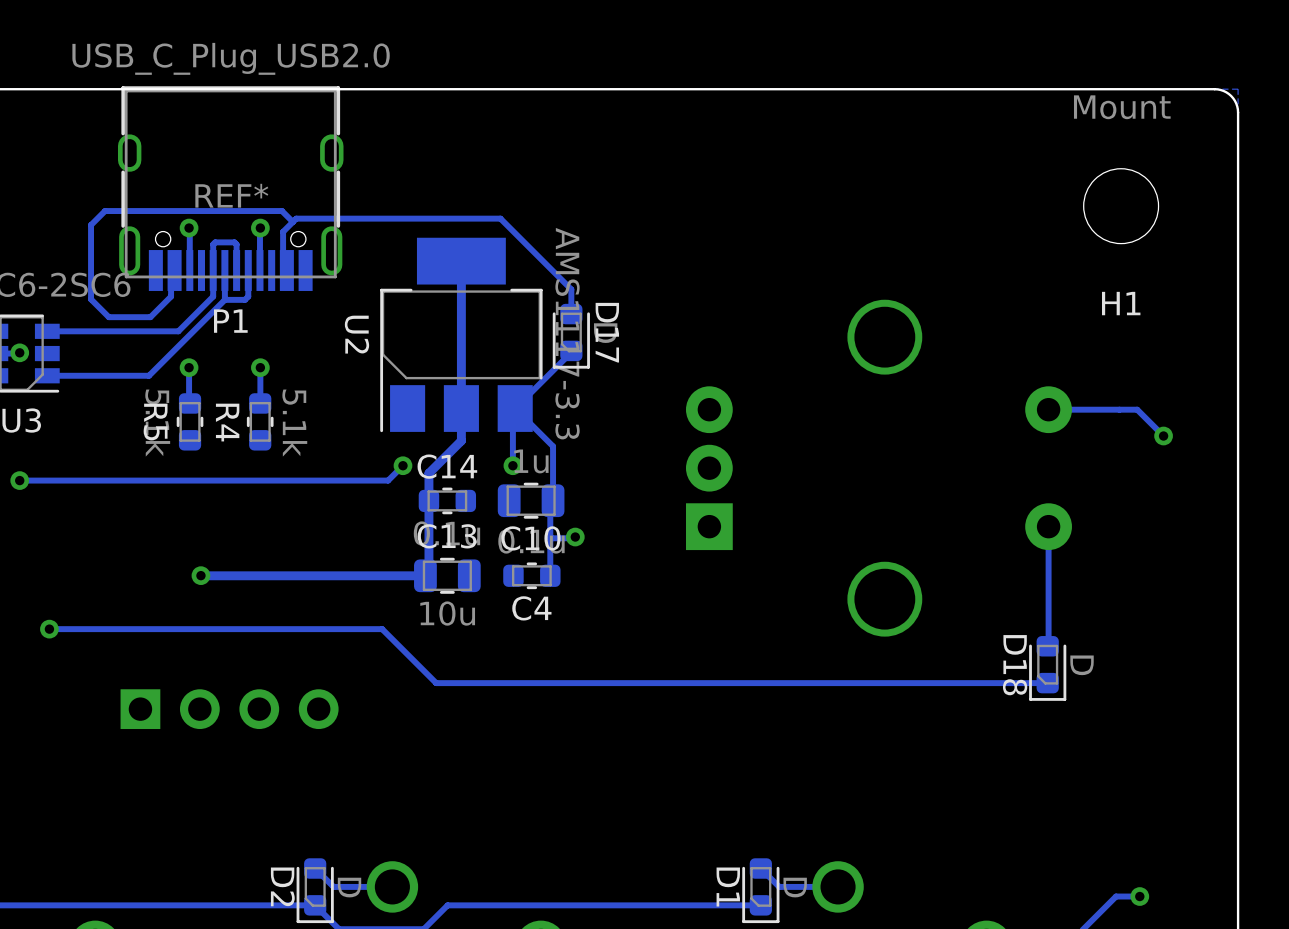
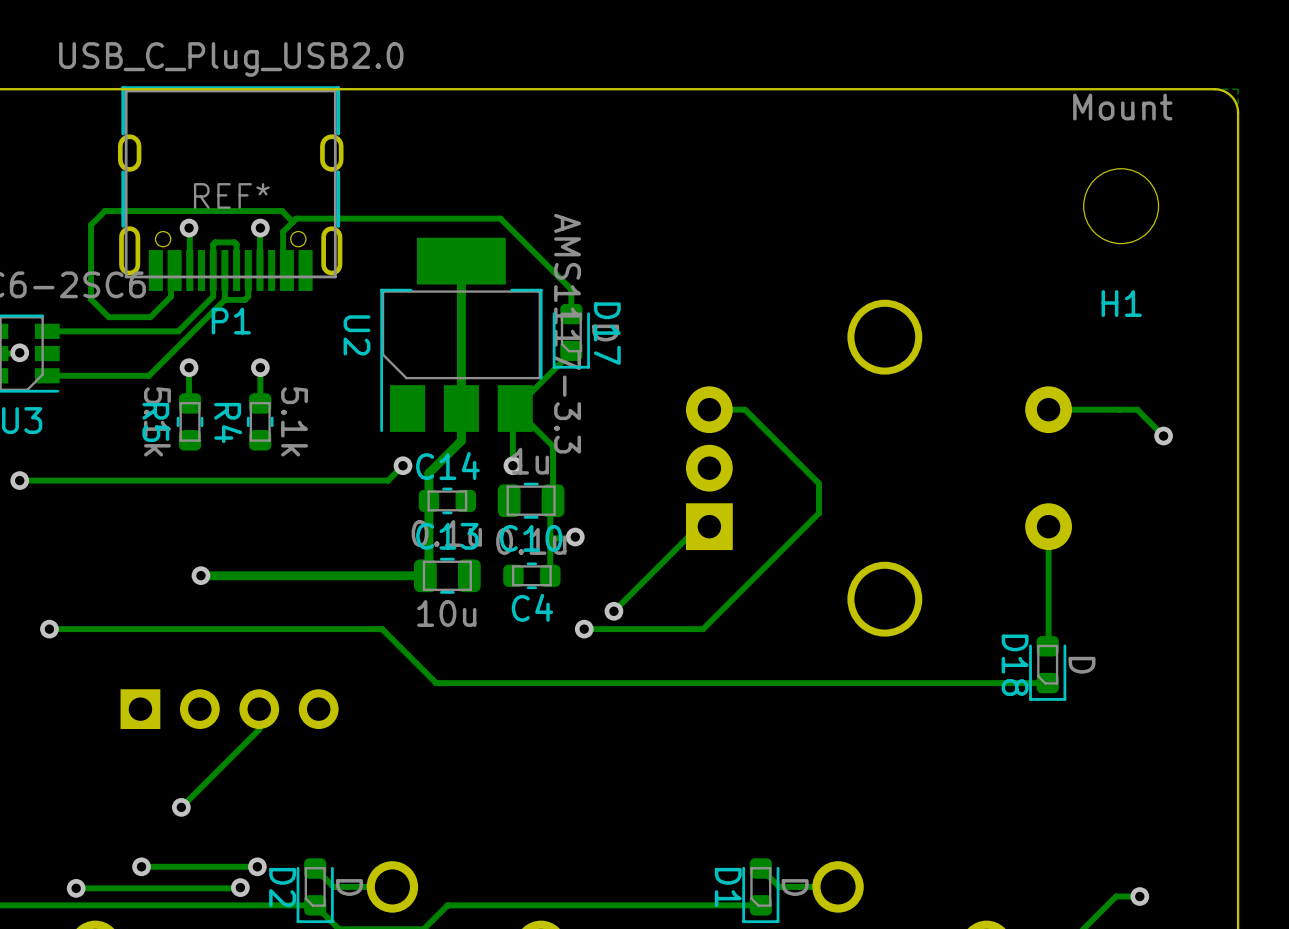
track: none -> (709, 409) (745, 409) (818, 483) (818, 513) (703, 629) (584, 629)
track: none -> (709, 526) (698, 526) (613, 611)
via: none -> (613, 611)
via: none -> (584, 629)
track: none -> (259, 709) (259, 729) (181, 807)
via: none -> (181, 807)
via: none -> (141, 866)
track: none -> (257, 866) (141, 866)
via: none -> (257, 866)
track: none -> (240, 887) (76, 888)
via: none -> (240, 887)
via: none -> (76, 888)

